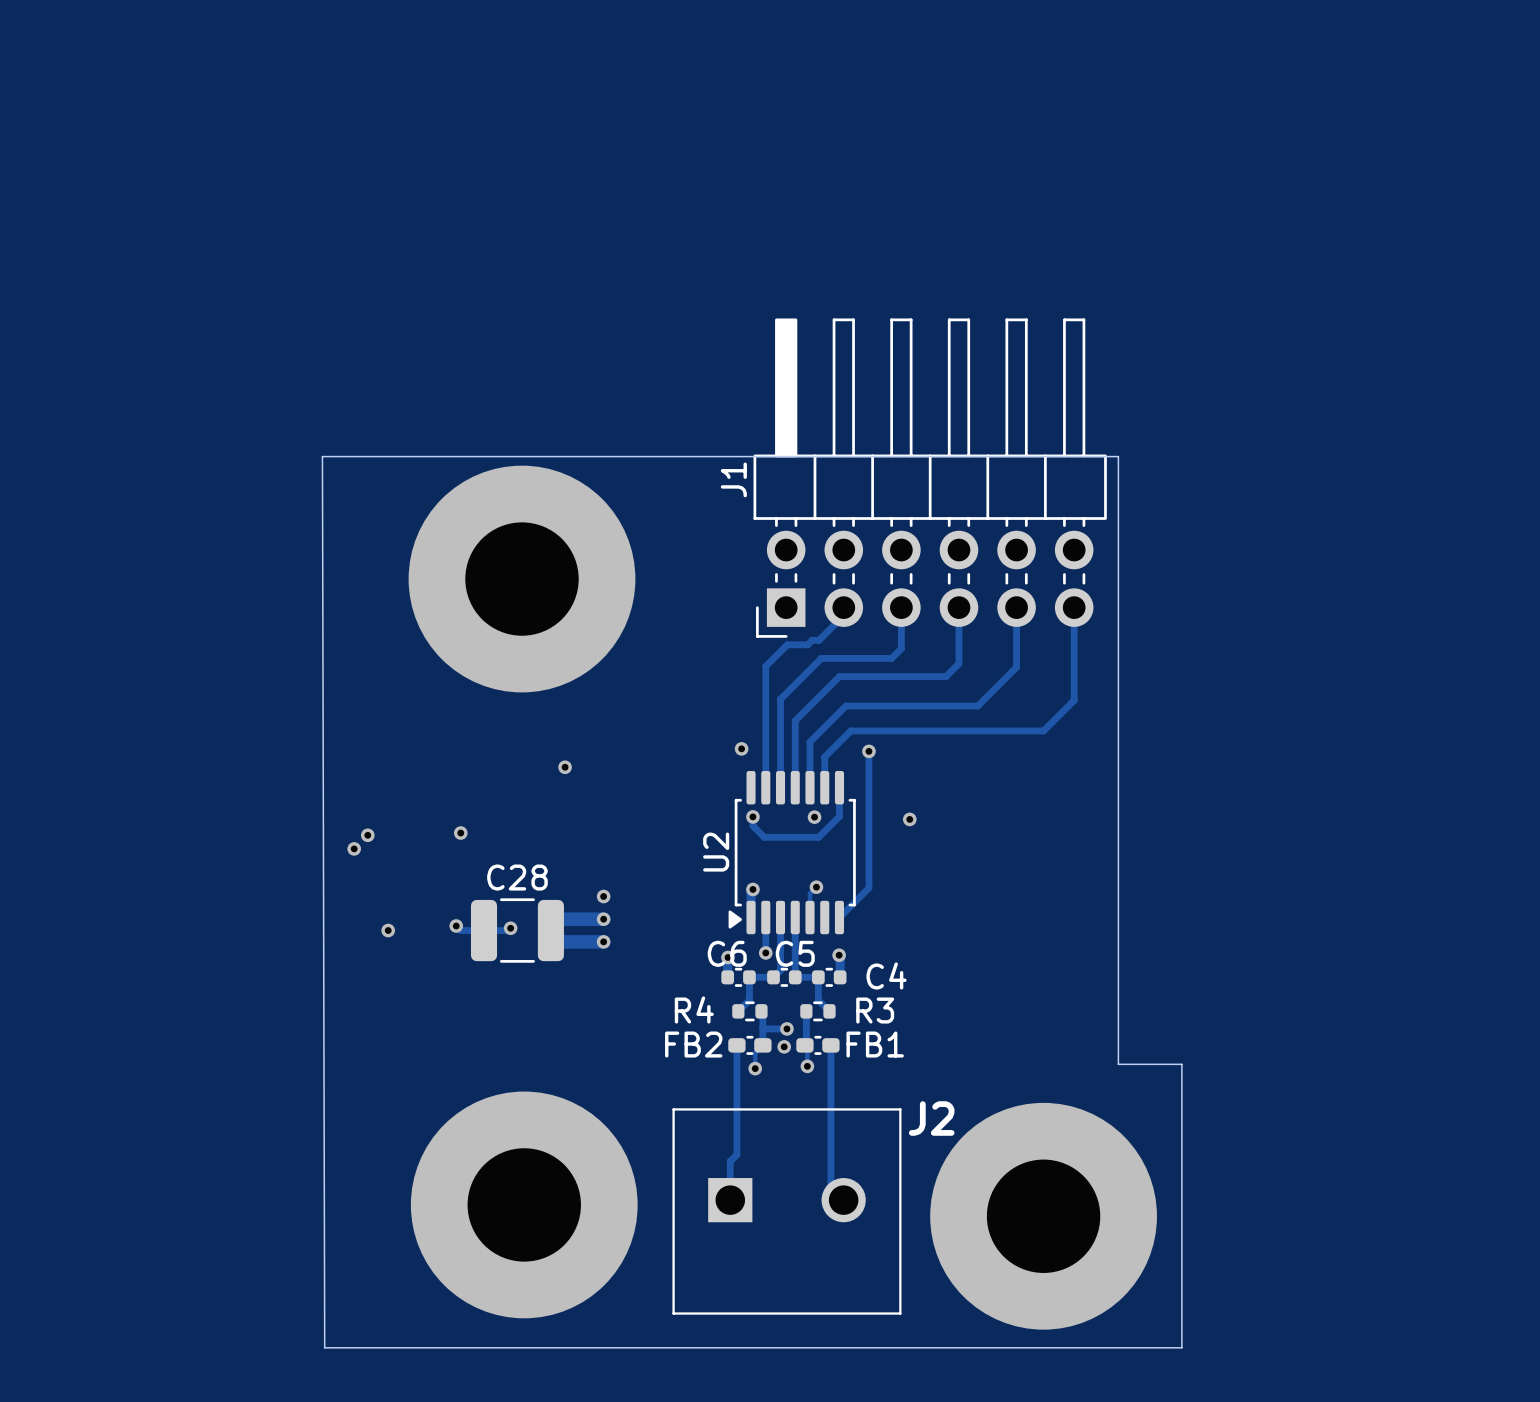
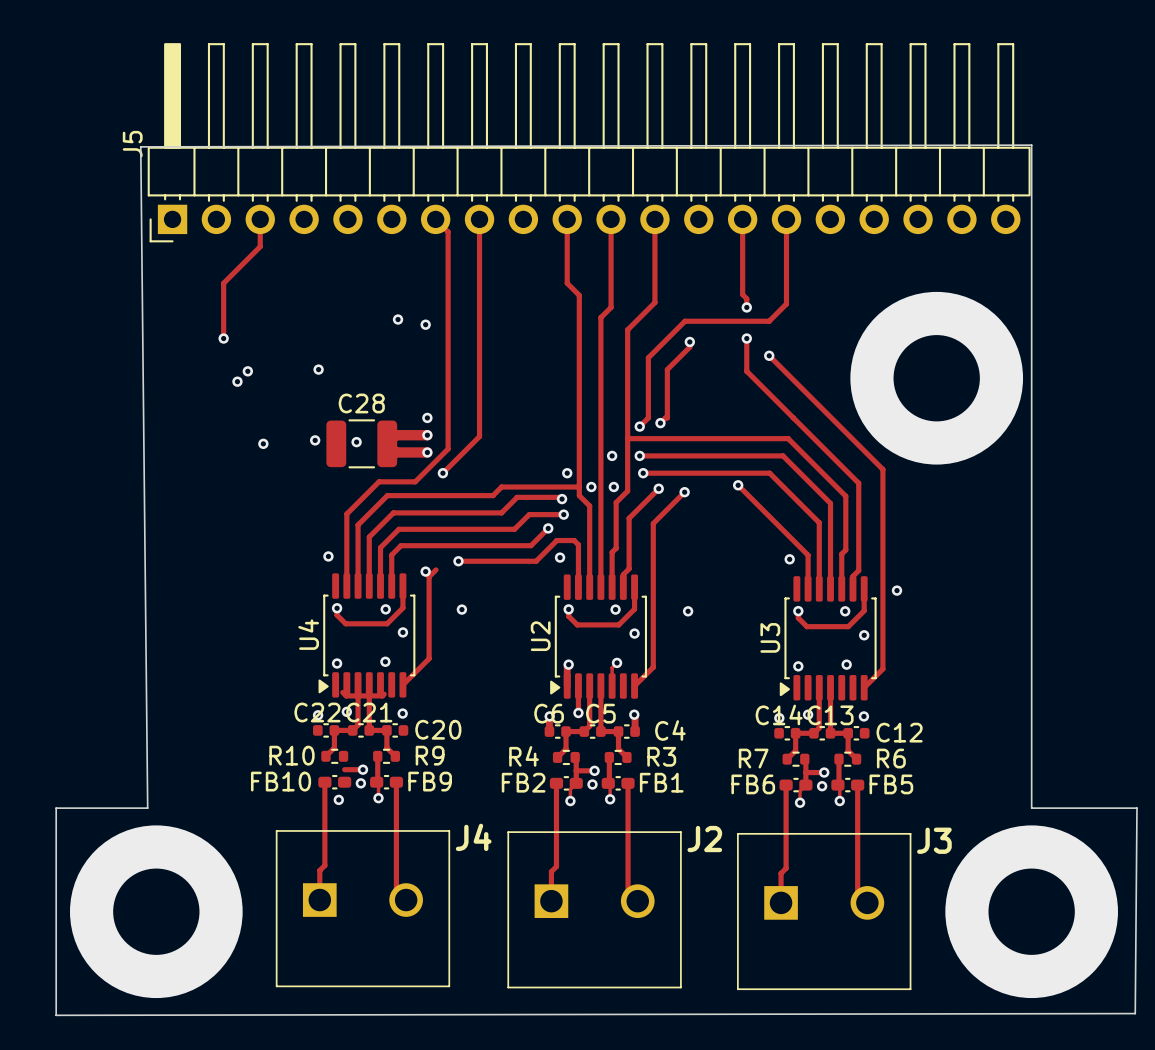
J5: none -> (589, 142)
board edge: none -> (1031, 145) (140, 146) (147, 808) (56, 808) (56, 1015) (1135, 1013) (1136, 808) (1031, 808) (1031, 145)
track: none -> (260, 219) (260, 246) (223, 283) (223, 338)
track: none -> (435, 219) (448, 231) (448, 449) (415, 481) (379, 481) (346, 513)
track: none -> (479, 219) (479, 436) (442, 473)
track: none -> (742, 219) (742, 294) (746, 298) (746, 307)
track: none -> (786, 219) (786, 303) (769, 321) (684, 321) (648, 357) (648, 417) (639, 426)
via: none -> (746, 307)
via: none -> (398, 319)
via: none -> (425, 324)
board edge: (322, 456) (1118, 456) (1118, 1064) (1181, 1064) (1181, 1347) (324, 1347) (322, 456) -> none
via: none -> (223, 338)
track: none -> (746, 338) (746, 371) (858, 483) (858, 570) (852, 576) (852, 588)
via: none -> (746, 338)
track: none -> (689, 341) (689, 347) (667, 369) (667, 417) (660, 423)
via: none -> (689, 341)
J1: (930, 478) -> none
track: none -> (769, 355) (882, 469) (882, 669) (864, 687)
via: none -> (769, 355)
via: none -> (318, 369)
via: none -> (247, 371)
via: none -> (936, 378)
via: none -> (237, 381)
via: none -> (427, 417)
via: none -> (660, 423)
via: none -> (639, 426)
via: (522, 579) -> none
via: none -> (427, 435)
track: none -> (627, 438) (788, 438) (845, 496) (845, 550) (841, 554) (841, 588)
via: none -> (315, 440)
via: none -> (356, 442)
via: none -> (263, 443)
track: (843, 607) (843, 615) (819, 640) (812, 640) (807, 644) (787, 644) (765, 666) (765, 732) -> (458, 561) (536, 561) (556, 540) (574, 540) (578, 544)
track: (901, 607) (901, 648) (891, 658) (821, 658) (780, 699) -> (567, 219) (567, 283) (579, 295) (579, 495) (589, 505) (589, 519)
track: (958, 607) (958, 663) (946, 676) (839, 676) (795, 720) -> (611, 219) (611, 307) (600, 317) (600, 536)
track: (1016, 607) (1016, 667) (977, 706) (845, 706) (815, 736) -> (654, 219) (654, 302) (627, 329) (627, 491) (616, 502) (616, 548)
track: (1074, 607) (1074, 700) (1043, 730) (850, 730) (824, 757) (824, 771) -> (658, 488) (629, 518) (629, 568) (623, 574)
via: none -> (427, 452)
via: none -> (612, 455)
track: none -> (639, 455) (783, 455) (830, 503) (830, 588)
via: none -> (639, 455)
via: none -> (442, 473)
via: none -> (567, 473)
track: none -> (643, 473) (769, 473) (819, 522) (819, 588)
via: none -> (643, 473)
track: none -> (738, 485) (808, 555) (808, 588)
via: none -> (738, 485)
track: none -> (579, 487) (501, 487) (492, 495) (387, 495) (358, 524) (358, 586)
via: none -> (591, 487)
via: none -> (613, 487)
via: none -> (658, 488)
via: none -> (684, 492)
track: none -> (562, 499) (560, 497) (517, 497) (501, 512) (393, 512) (369, 537) (369, 586)
via: none -> (562, 499)
track: none -> (346, 513) (346, 586)
track: none -> (563, 514) (529, 514) (514, 529) (398, 529) (380, 547) (380, 586)
via: none -> (563, 514)
track: none -> (548, 528) (530, 545) (401, 545) (391, 555) (391, 586)
via: none -> (548, 528)
via: none -> (328, 556)
track: (868, 751) (868, 888) (864, 892) -> (684, 492) (653, 523) (653, 667)
via: (868, 751) -> none
via: none -> (789, 559)
via: none -> (458, 561)
track: none -> (436, 569) (429, 576) (429, 658) (402, 684)
track: none -> (402, 586) (402, 607) (387, 623) (345, 623) (337, 615) (337, 608)
track: none -> (864, 588) (864, 610) (848, 626) (806, 626) (798, 618) (798, 611)
via: none -> (896, 590)
via: none -> (385, 609)
via: none -> (461, 609)
via: none -> (798, 611)
via: none -> (845, 611)
via position: (460, 833) -> (337, 608)
via: (367, 835) -> none
via: none -> (402, 632)
via: (354, 848) -> none
via: none -> (634, 633)
via: none -> (864, 635)
U4: none -> (366, 635)
U3: none -> (828, 638)
via: none -> (385, 661)
via: none -> (337, 663)
via: none -> (846, 664)
via: none -> (798, 666)
via: (603, 896) -> none
track: none -> (358, 684) (358, 725) (352, 730) (334, 730) (334, 747) (325, 756)
track: none -> (369, 684) (369, 730) (386, 730) (386, 747) (395, 756)
track: (603, 919) (562, 919) (550, 930) (562, 941) (603, 941) -> (427, 435) (395, 435) (387, 443) (395, 452) (427, 452)
via: (603, 919) -> none
track: none -> (819, 687) (819, 727) (813, 733) (795, 733) (795, 750) (787, 759)
track: none -> (830, 687) (830, 733) (848, 733) (848, 750) (856, 759)
via: (456, 926) -> none
via: (510, 928) -> none
via: (388, 930) -> none
C28 position: (517, 930) -> (361, 443)
via: (603, 941) -> none
via: none -> (346, 711)
via: none -> (402, 713)
via: none -> (808, 714)
via: none -> (318, 715)
via: none -> (863, 716)
via: none -> (779, 718)
C22: none -> (326, 730)
C21: none -> (360, 730)
C20: none -> (395, 730)
C14: none -> (787, 733)
C13: none -> (822, 733)
C12: none -> (856, 733)
R10: none -> (334, 756)
track: none -> (377, 756) (376, 782) (378, 784) (378, 798)
R9: none -> (386, 756)
R7: none -> (795, 759)
track: none -> (804, 759) (805, 785) (800, 790) (800, 802)
track: none -> (838, 759) (837, 785) (839, 786) (839, 801)
R6: none -> (847, 759)
track: none -> (344, 769) (362, 769)
via: none -> (362, 769)
track: none -> (805, 772) (824, 772)
via: none -> (824, 772)
track: none -> (324, 782) (324, 865) (319, 870) (319, 900)
FB10: none -> (334, 782)
FB9: none -> (386, 782)
track: none -> (396, 782) (396, 890) (406, 900)
via: none -> (360, 783)
track: none -> (786, 785) (786, 868) (781, 873) (781, 902)
FB6: none -> (795, 785)
FB5: none -> (847, 785)
track: none -> (857, 785) (857, 893) (867, 902)
via: none -> (822, 786)
via: none -> (378, 798)
via: none -> (338, 799)
via: none -> (839, 801)
via: none -> (800, 802)
via: (524, 1204) -> none
J4: none -> (362, 908)
J3: none -> (824, 911)
via: none -> (156, 911)
via: none -> (1031, 911)
via: (1043, 1216) -> none

